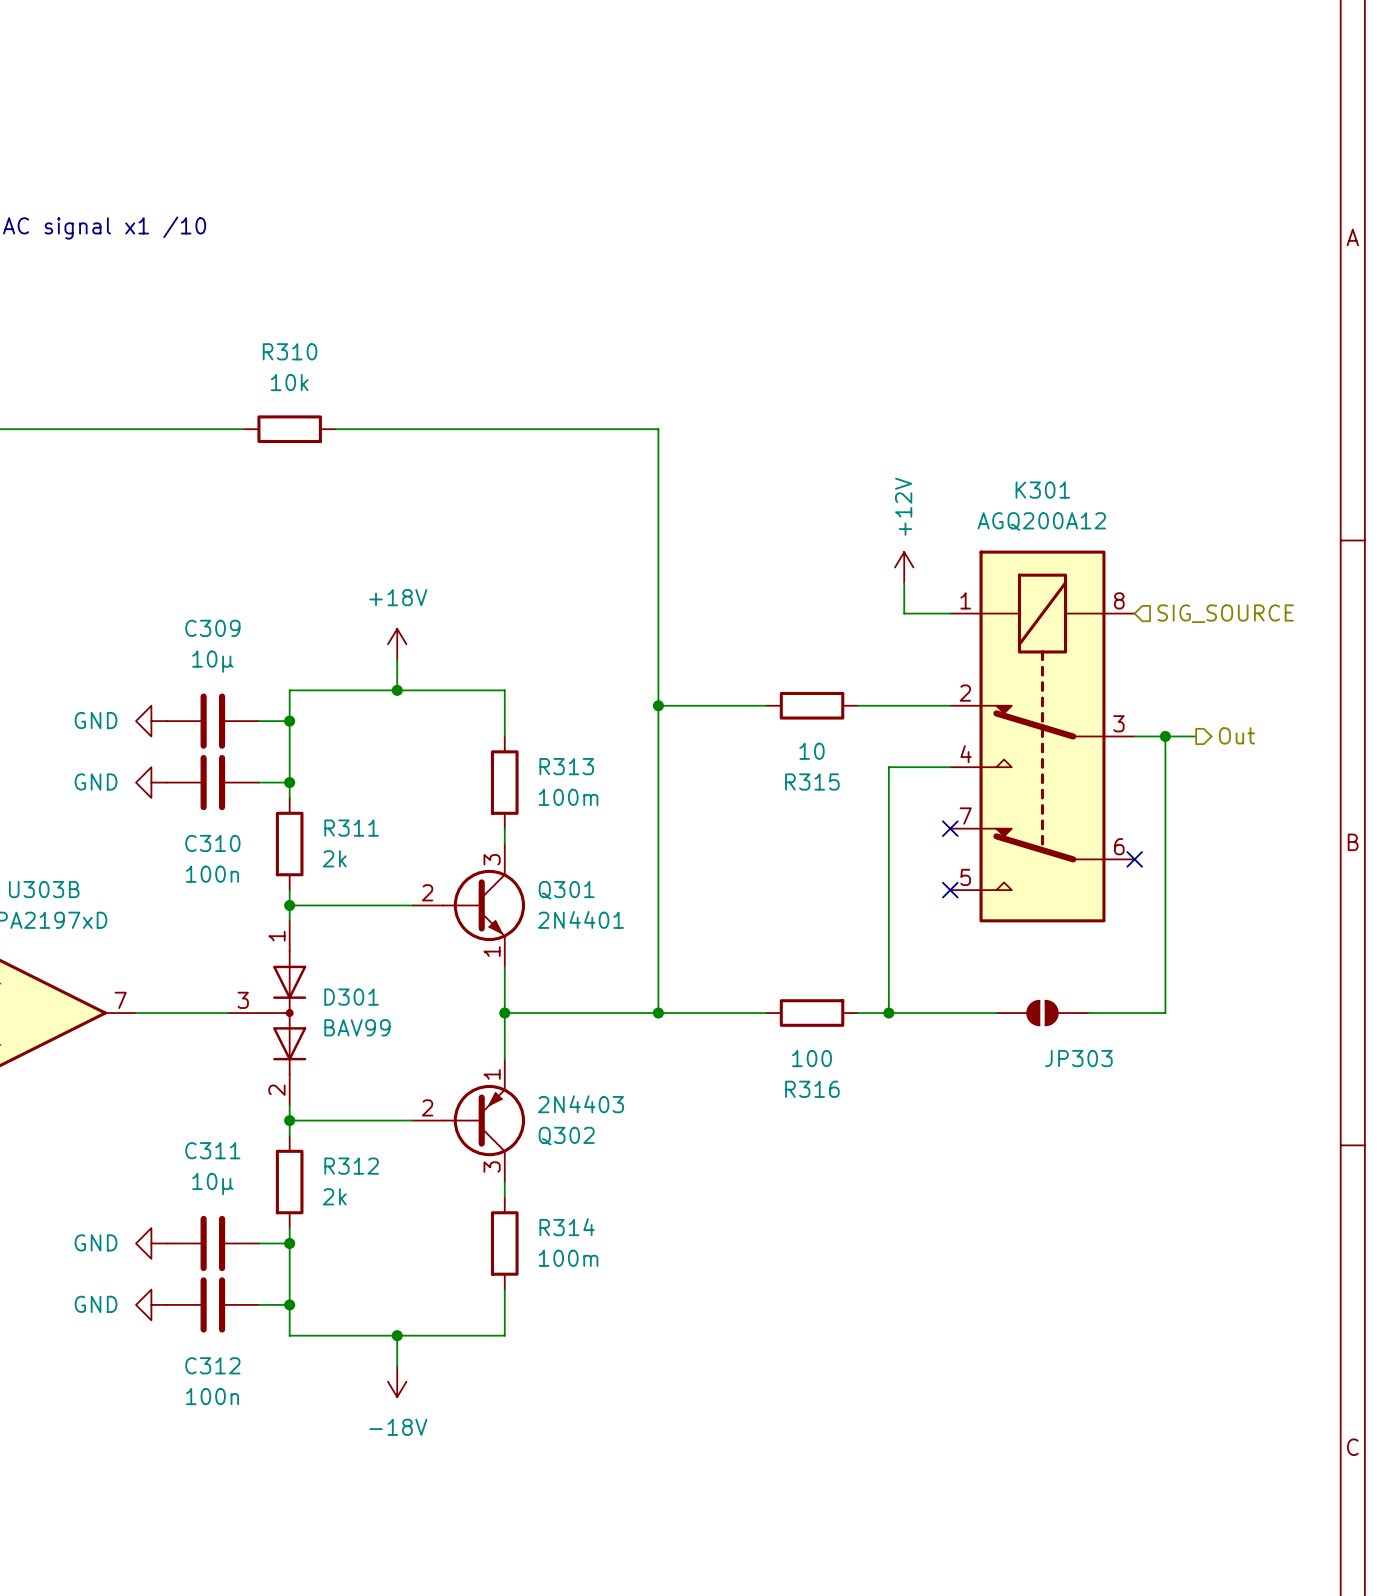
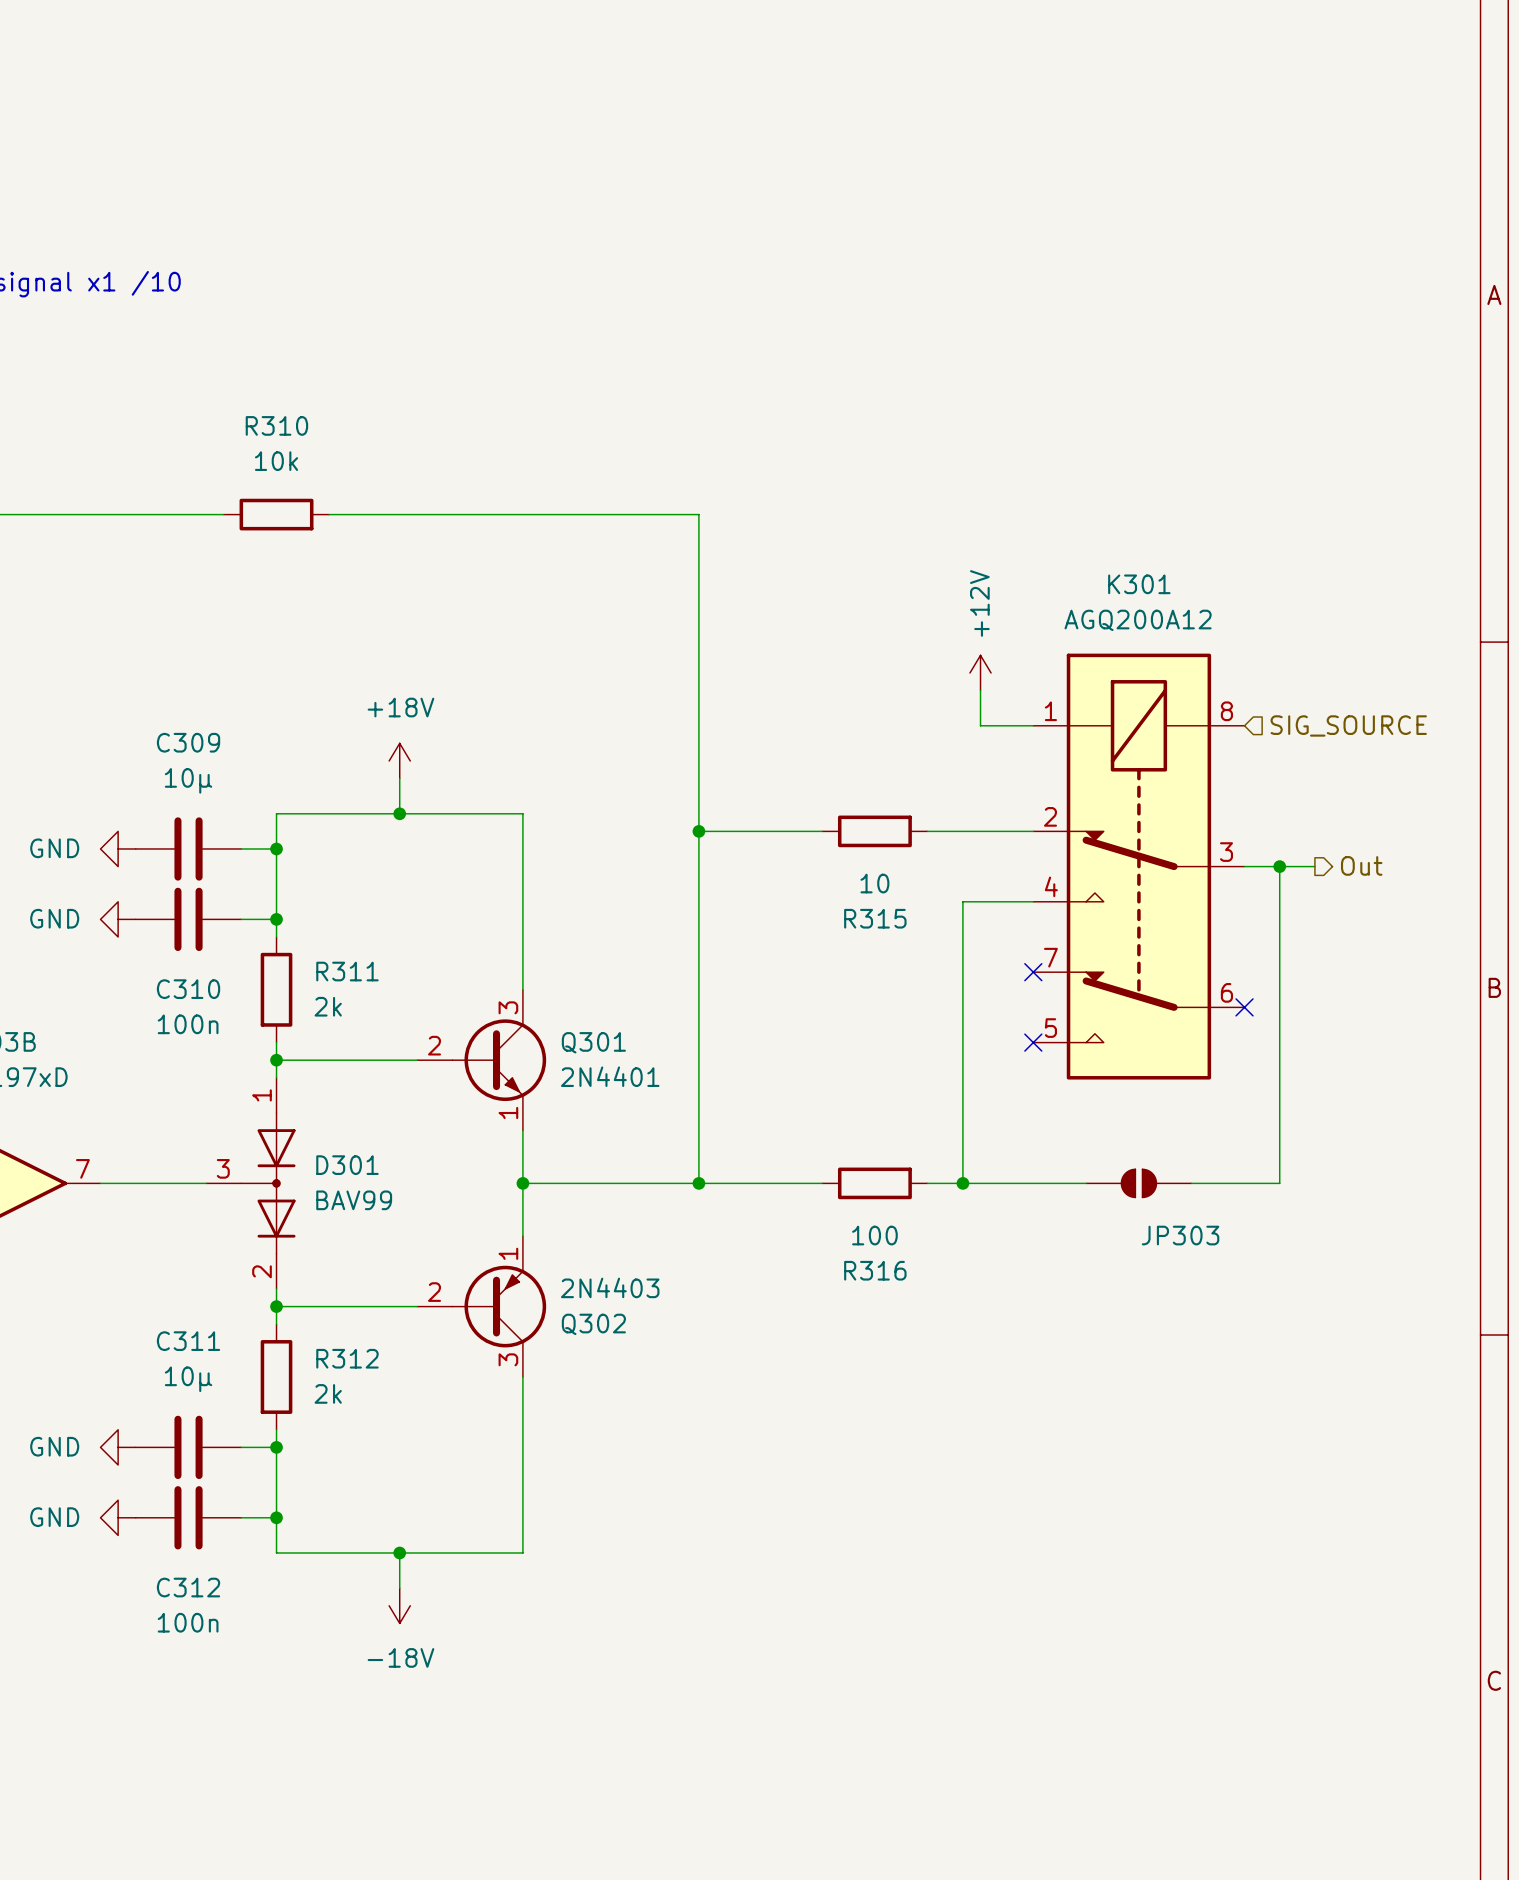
wire: none -> (522, 866) (522, 972)
R313: 100m (504, 782) -> none
wire: none -> (522, 1394) (522, 1500)
R314: 100m (504, 1243) -> none

